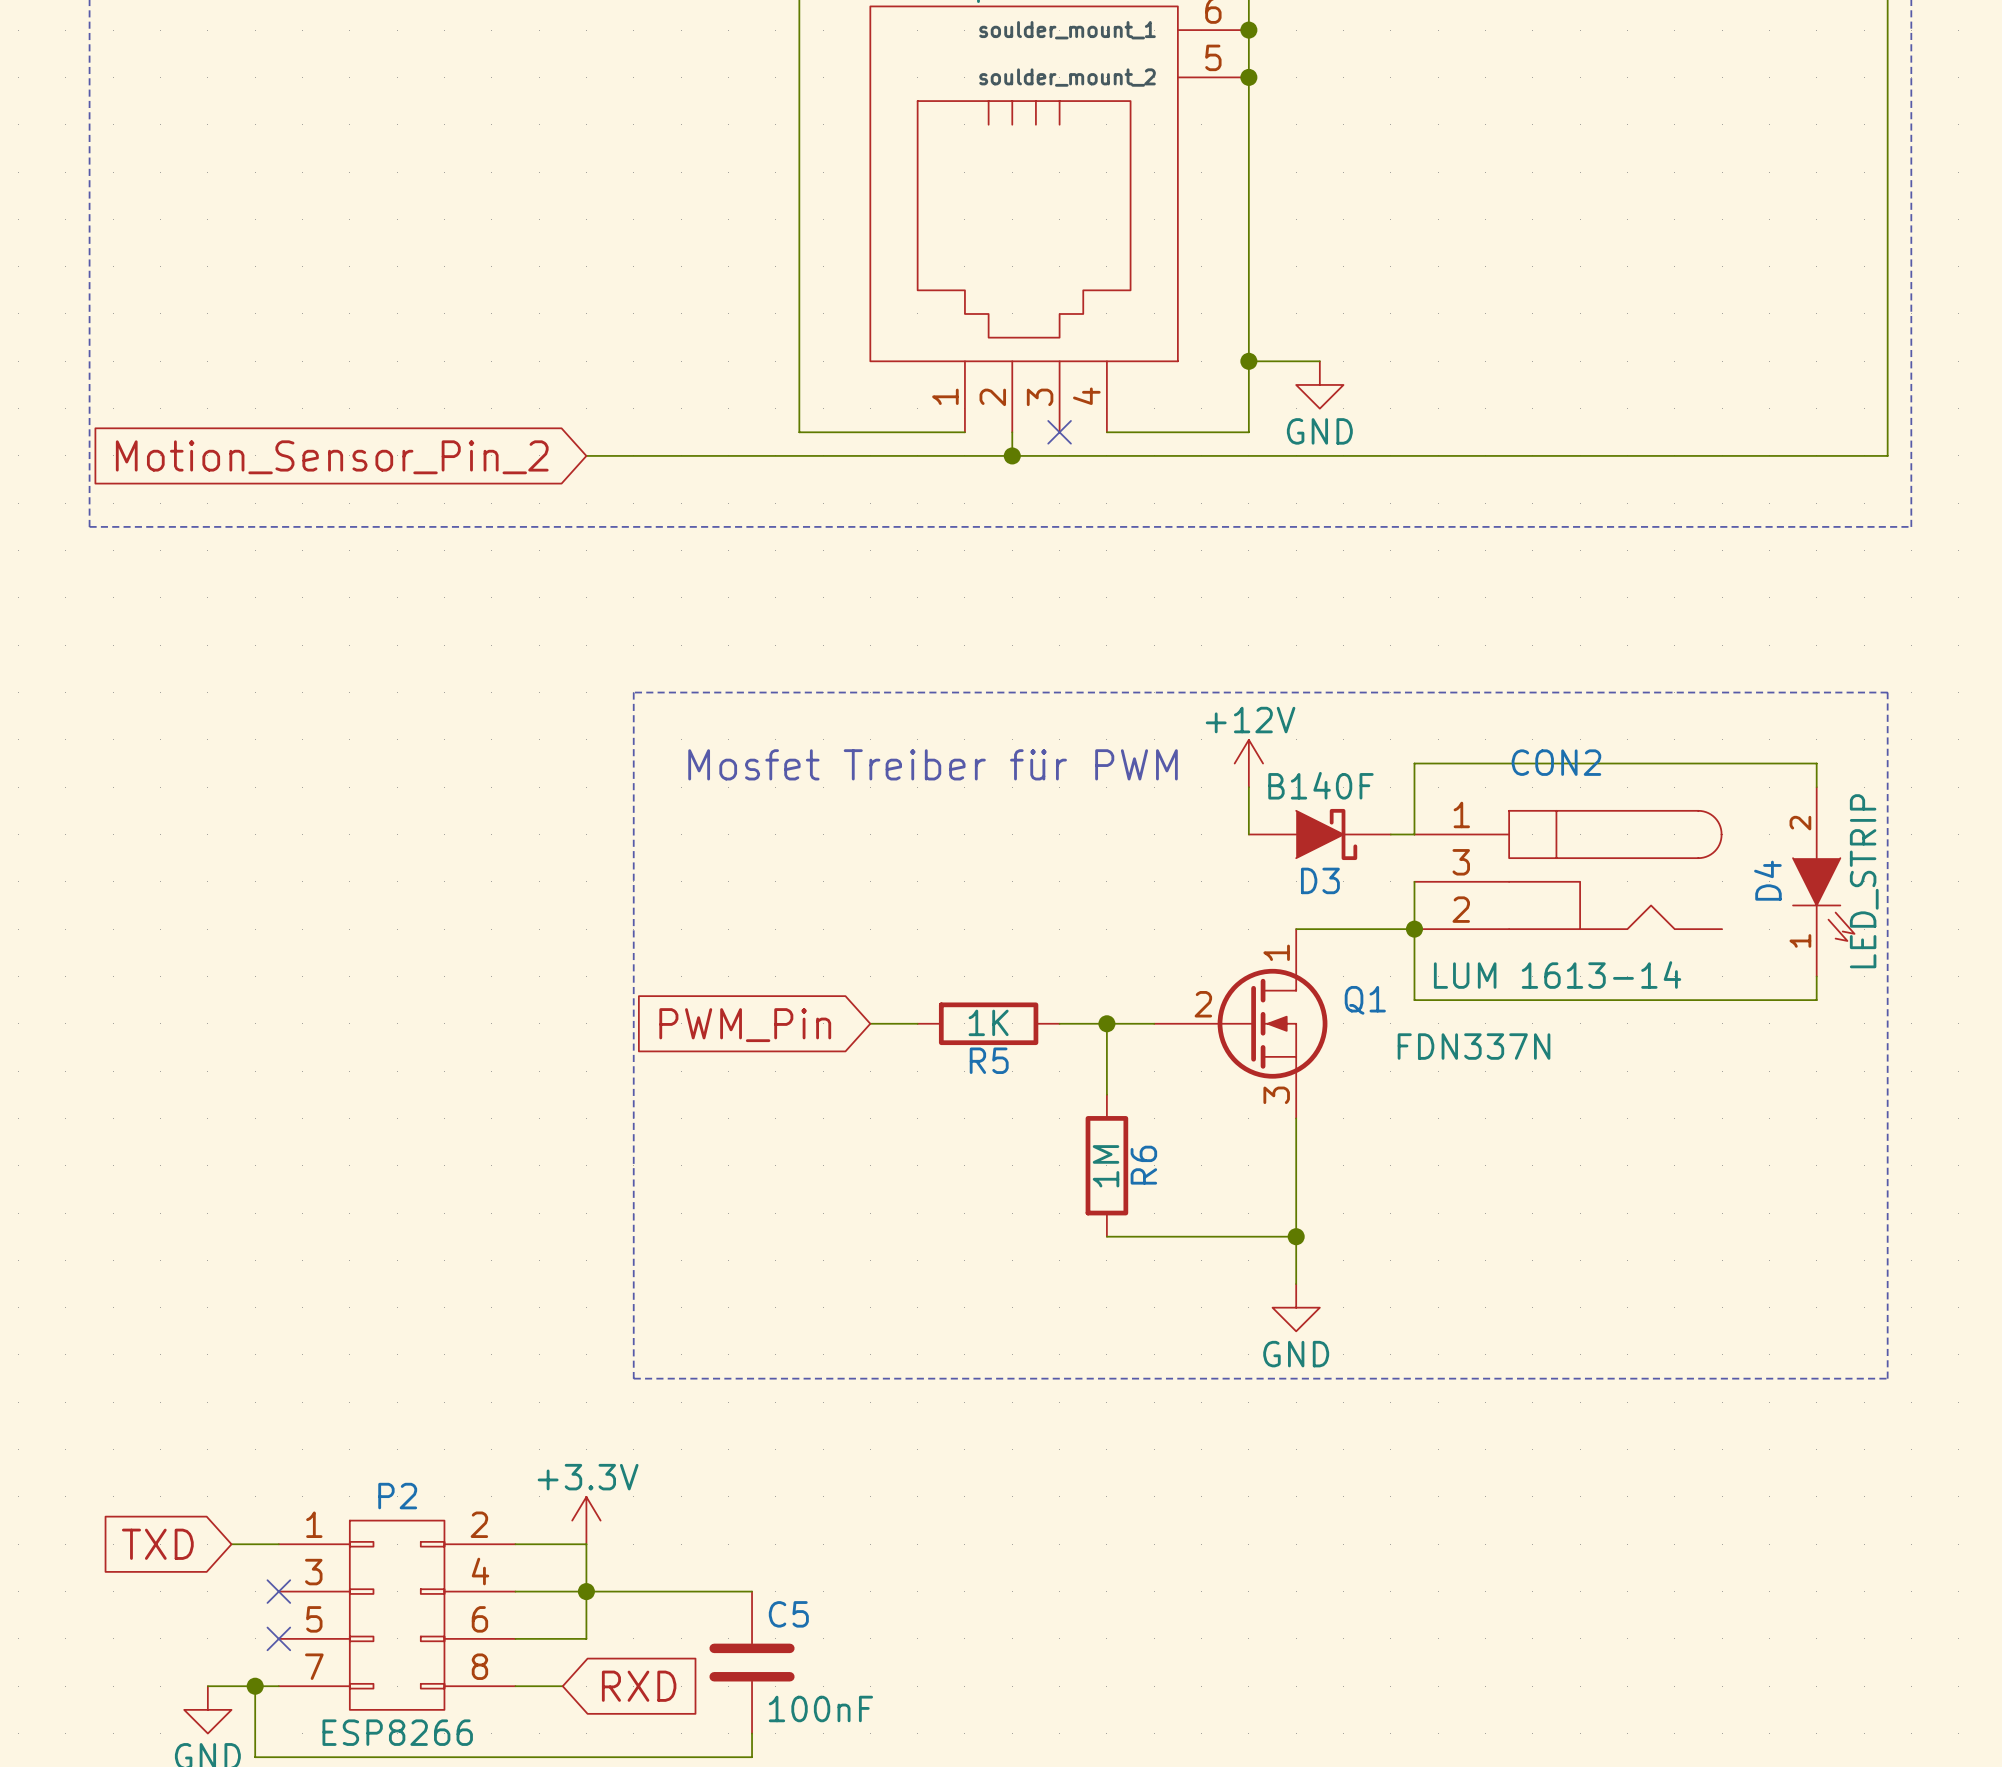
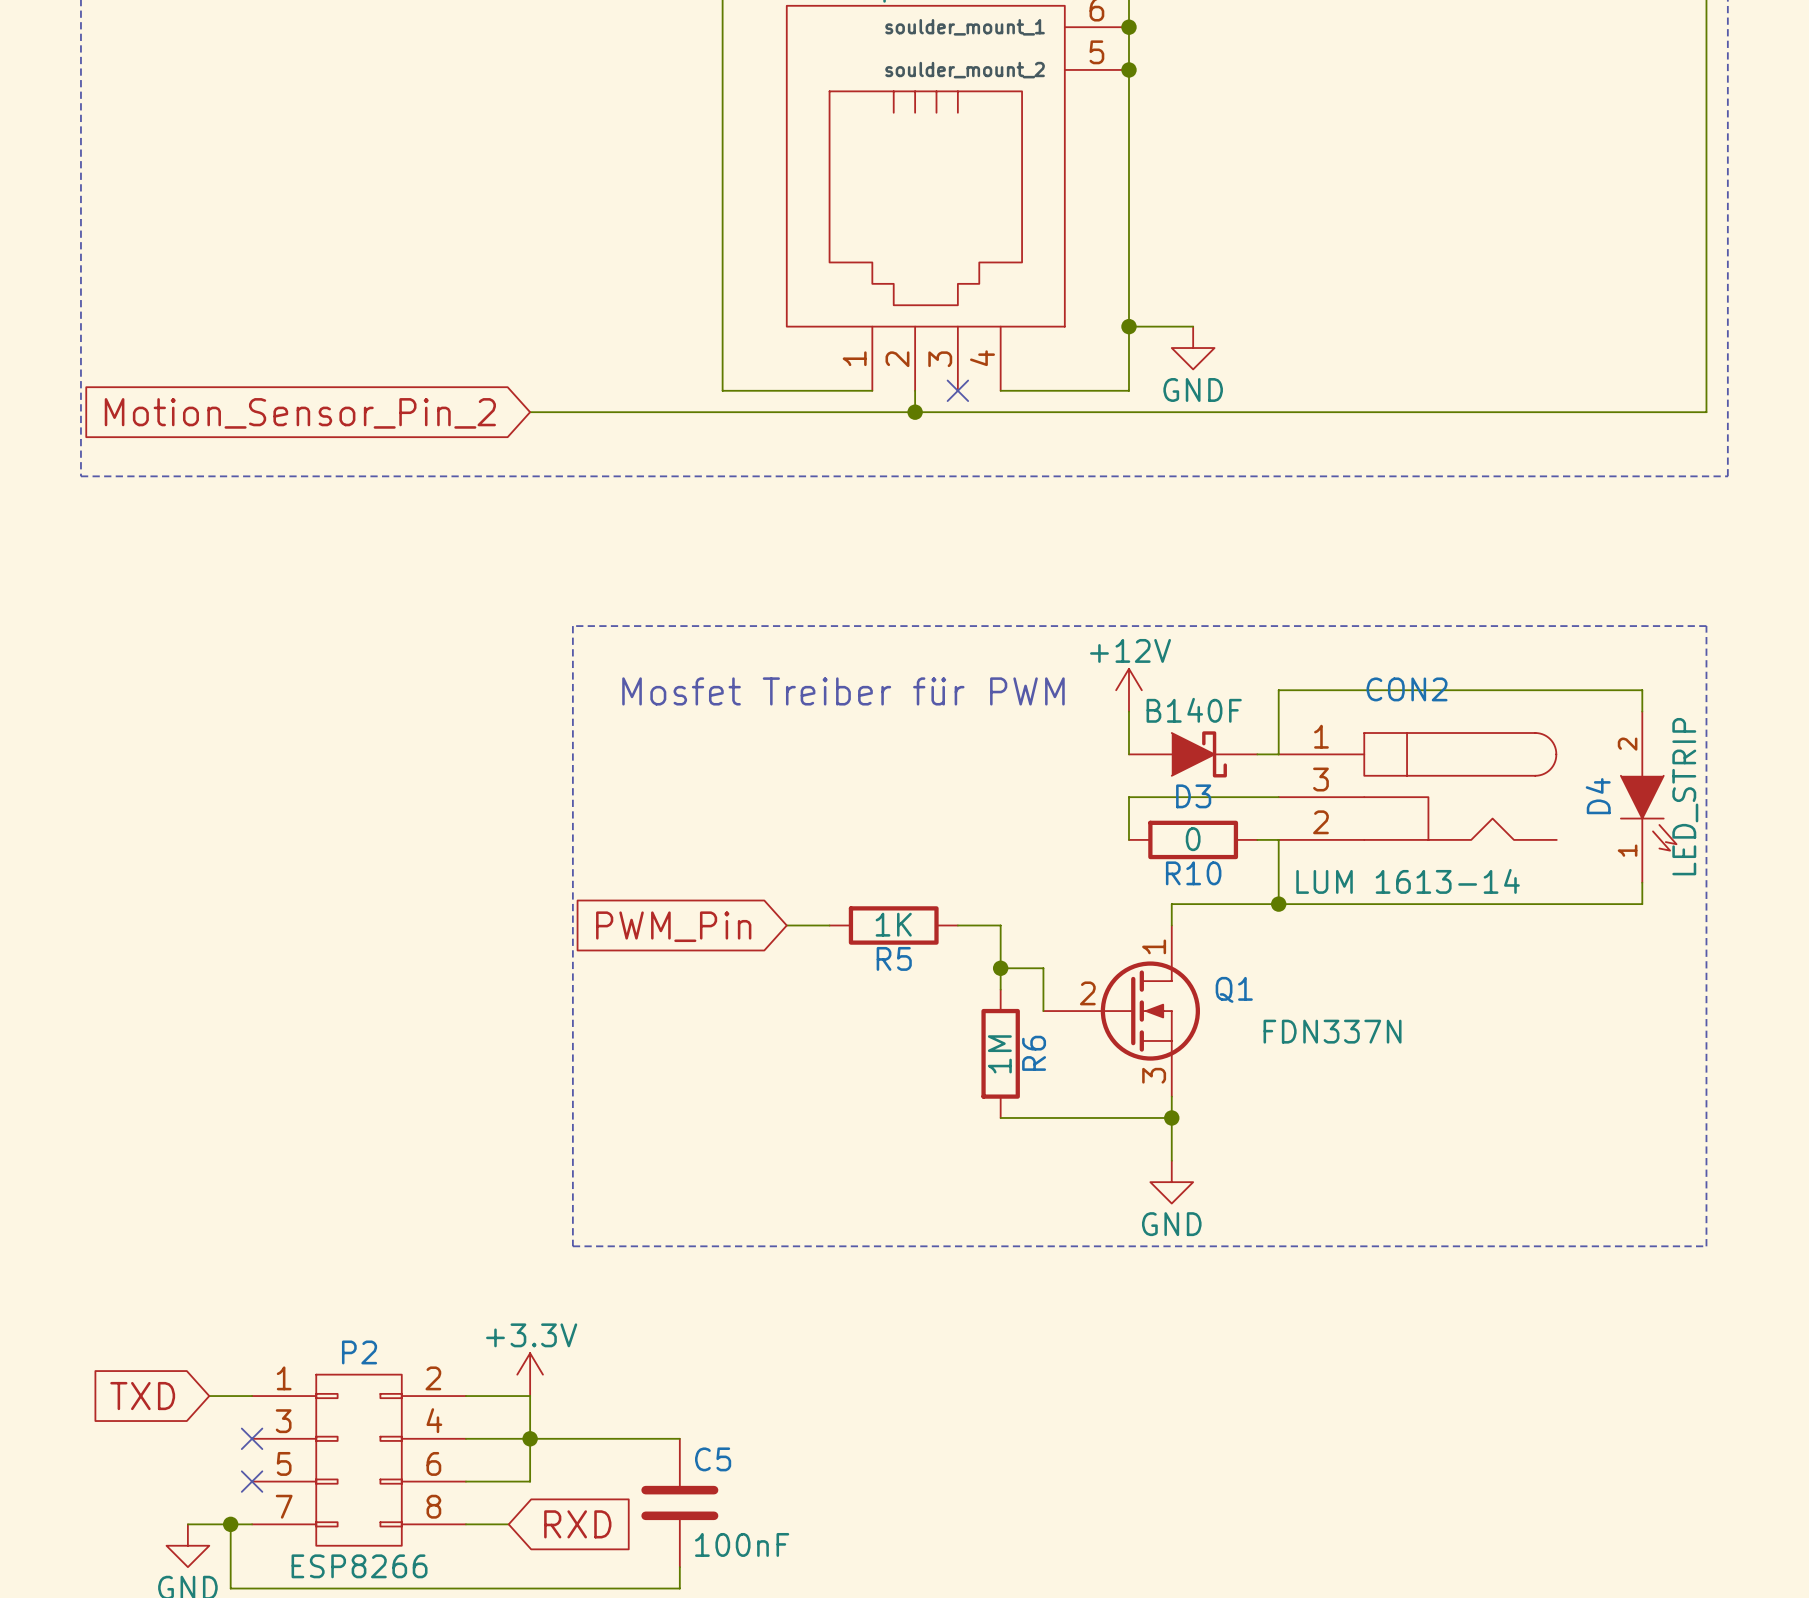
wire: (1414, 881) (1414, 929) -> (1278, 797) (1128, 797) (1128, 839)
wire: (1296, 929) (1390, 929) -> none
R10: none -> 0 (1193, 839)
junction position: (1414, 929) -> (1278, 904)
wire: none -> (1278, 904) (1171, 904) (1171, 925)
wire: (1106, 1023) (1154, 1023) -> none
junction position: (1106, 1023) -> (1000, 968)
Q1 position: (1240, 1023) -> (1121, 1011)
wire: none -> (1000, 968) (1043, 968) (1043, 1011)

